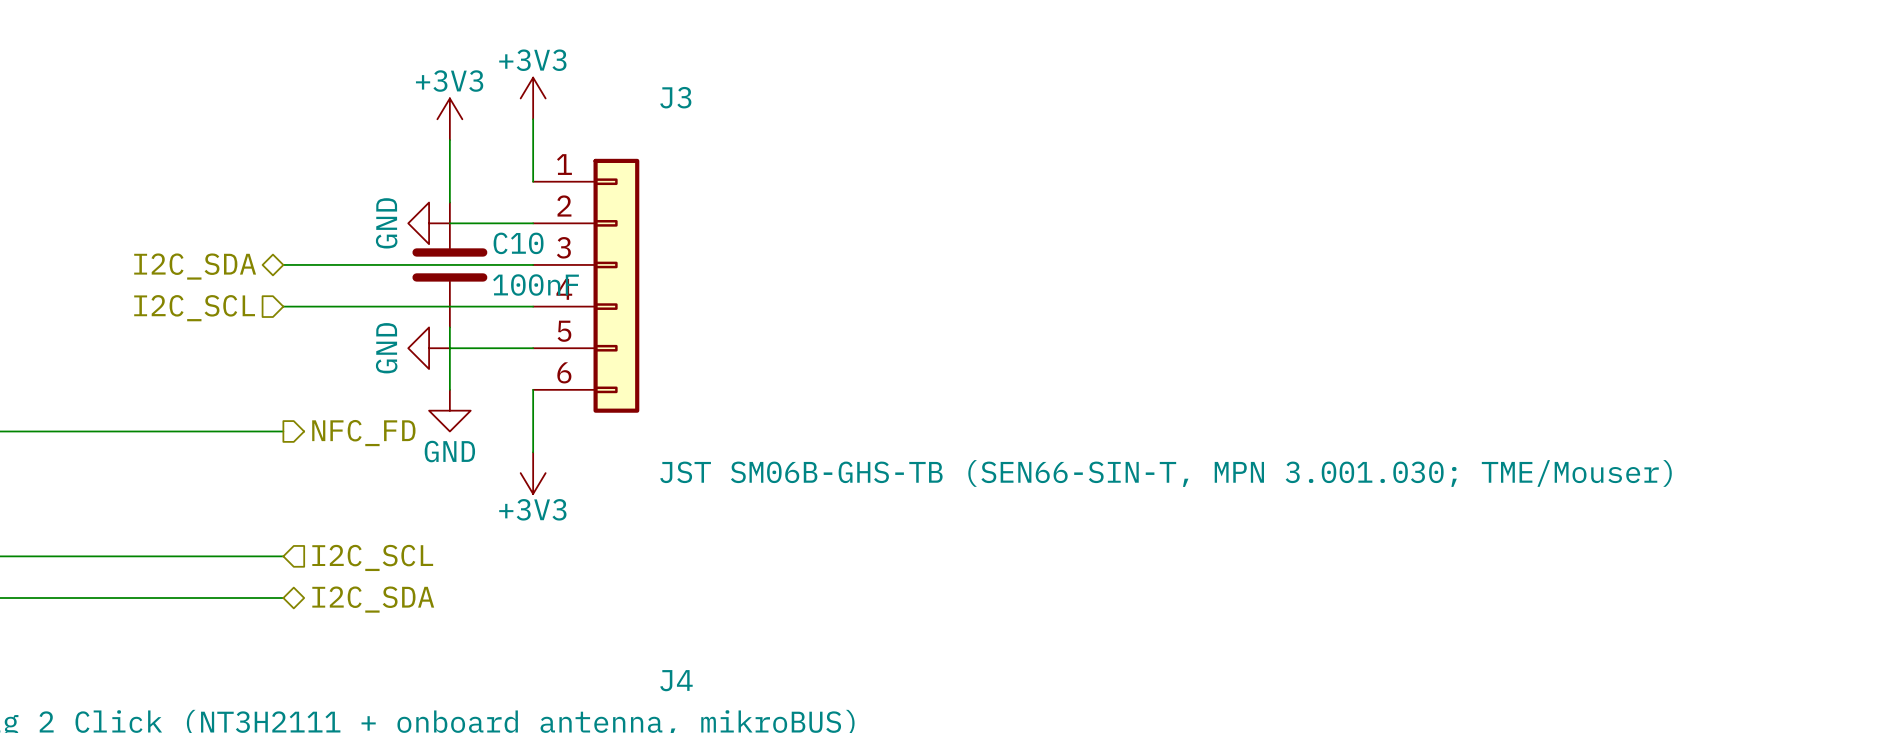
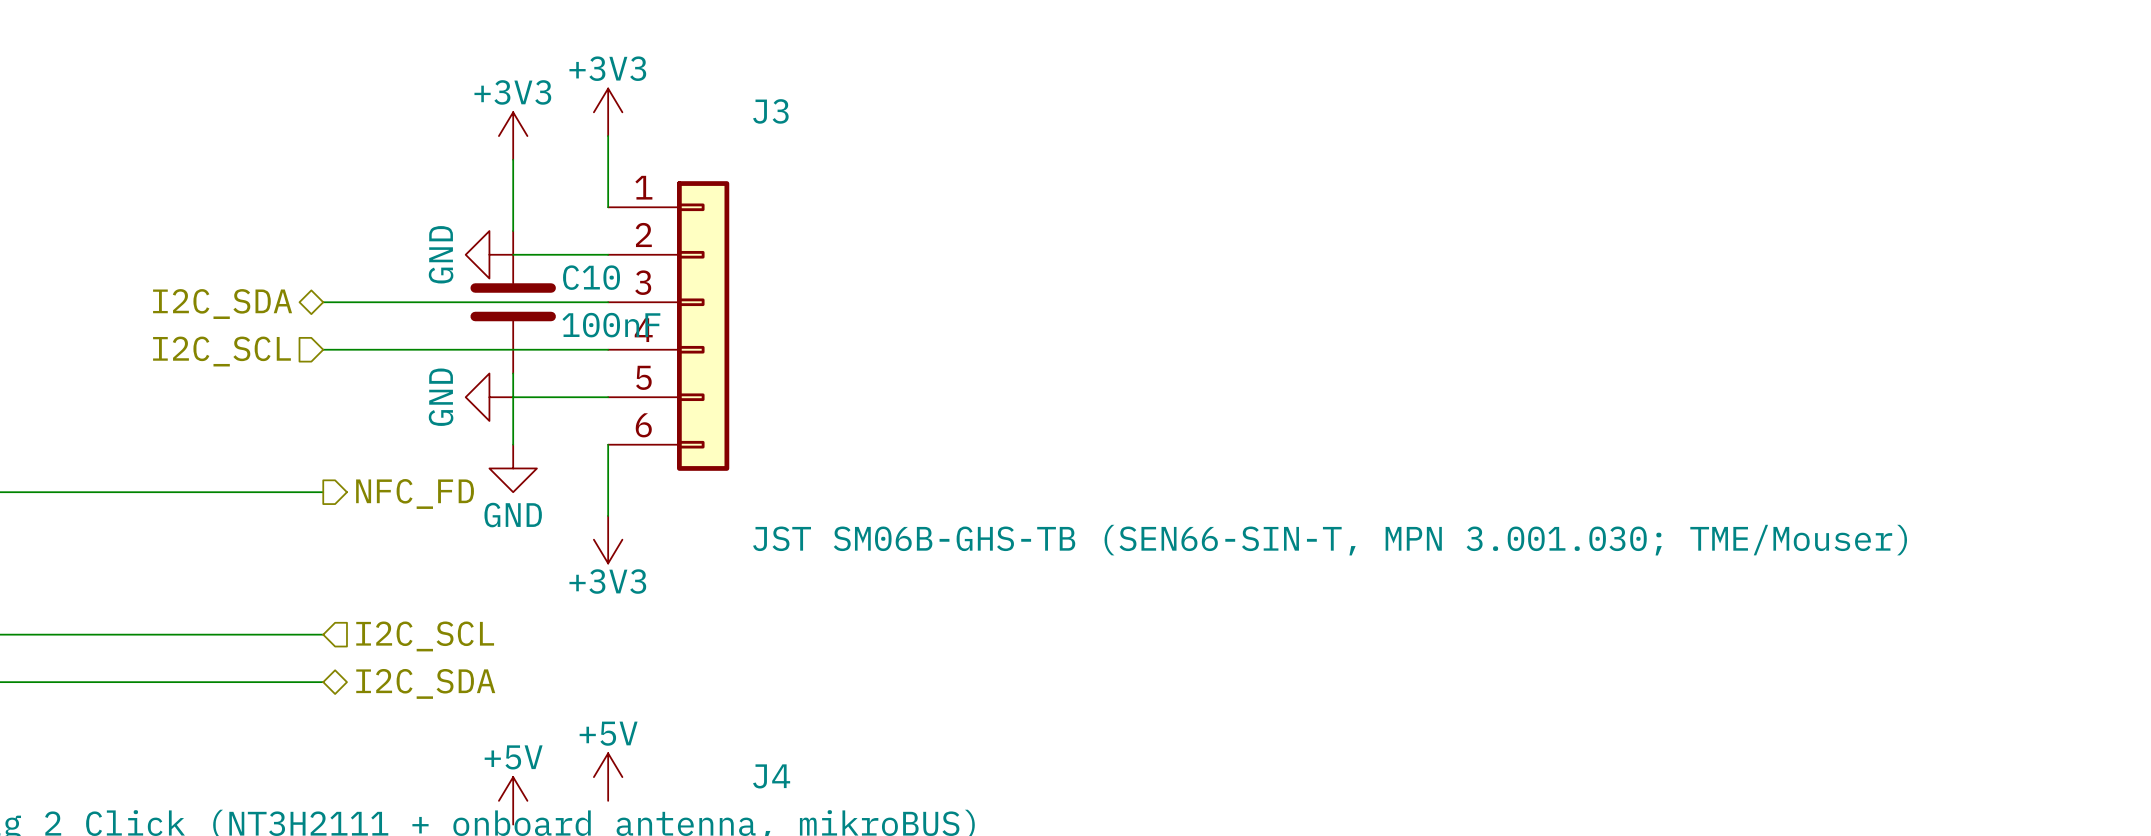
power symbol: none -> +5V (608, 777)
power symbol: none -> +5V (513, 800)

